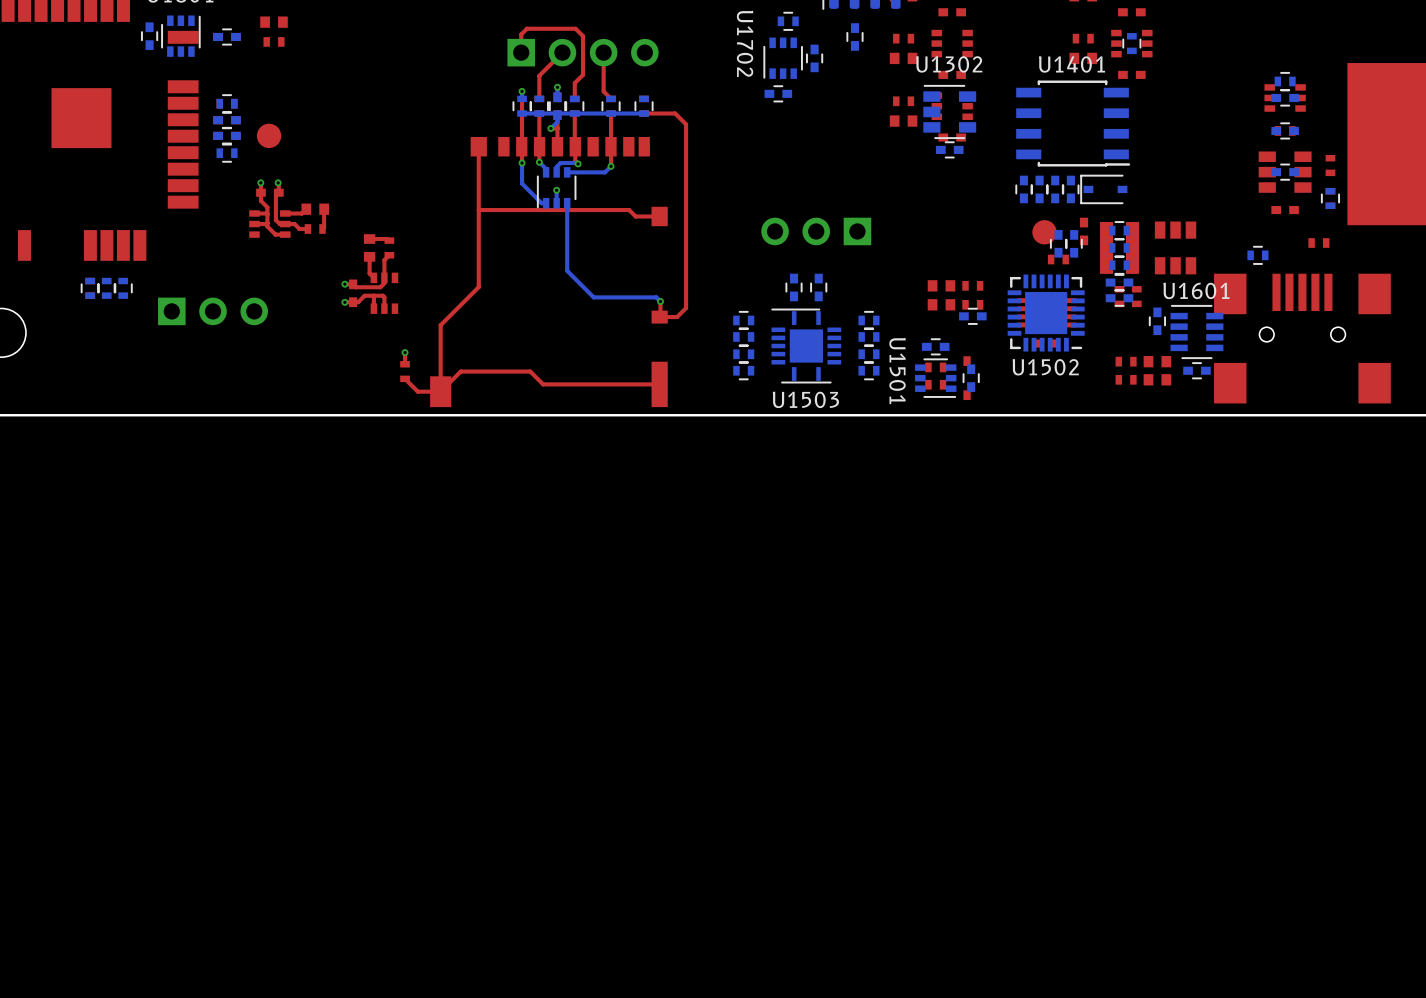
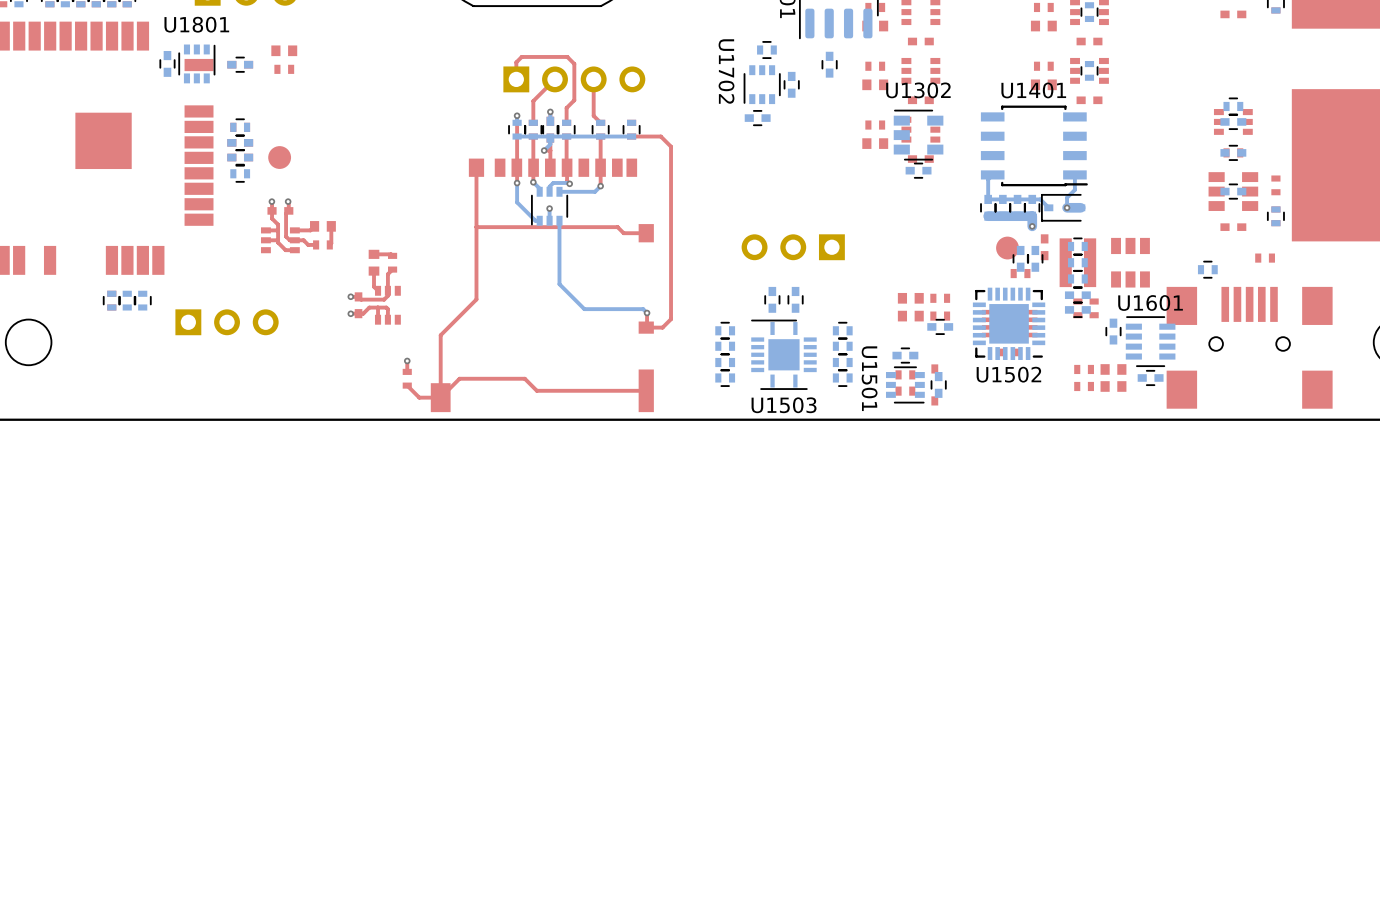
bottom track: none -> (992, 174) (988, 179) (988, 199) (1040, 199) (1048, 207)
bottom track: none -> (1074, 174) (1074, 189) (1067, 197) (1067, 207) (1080, 207)
via: none -> (1067, 207)
bottom track: none -> (988, 216) (1032, 216) (1032, 226)
via: none -> (1032, 226)

